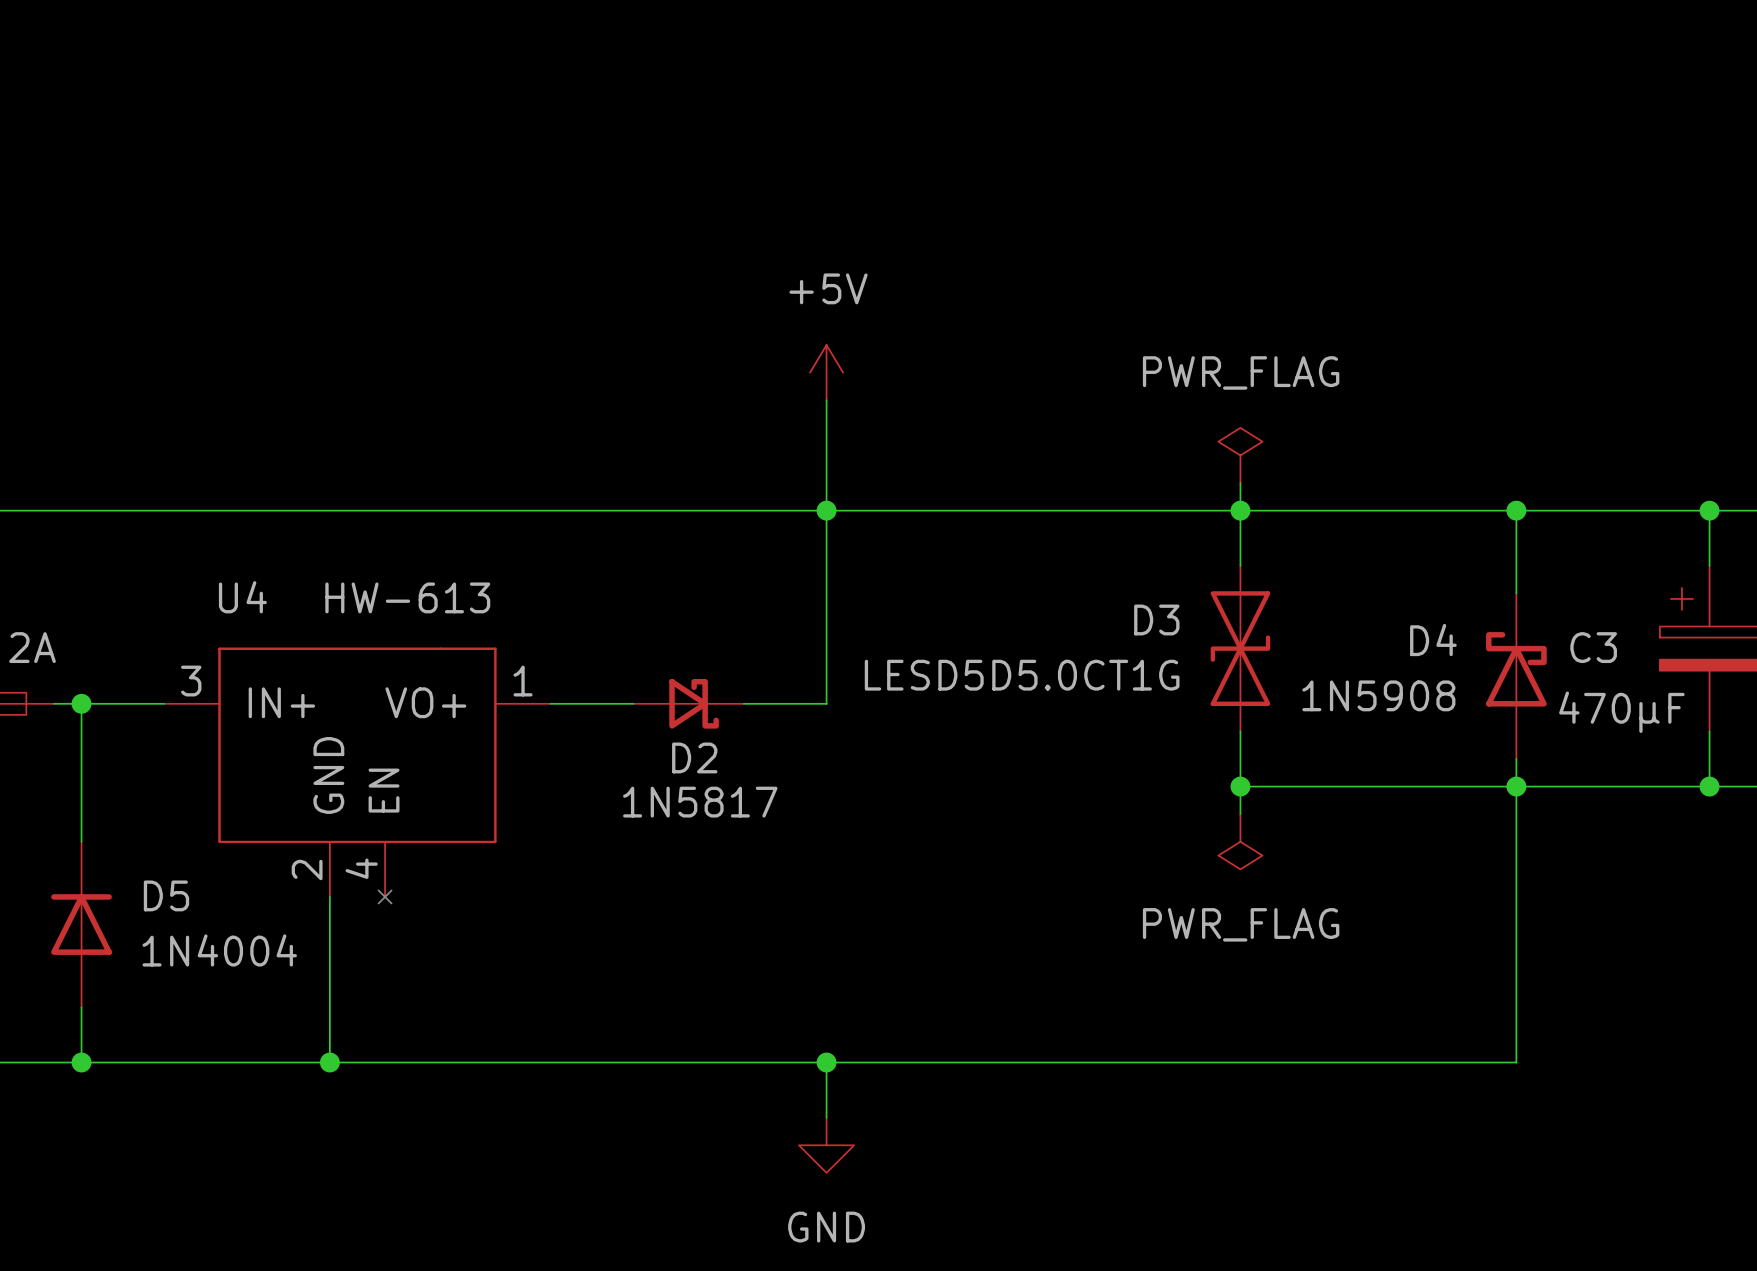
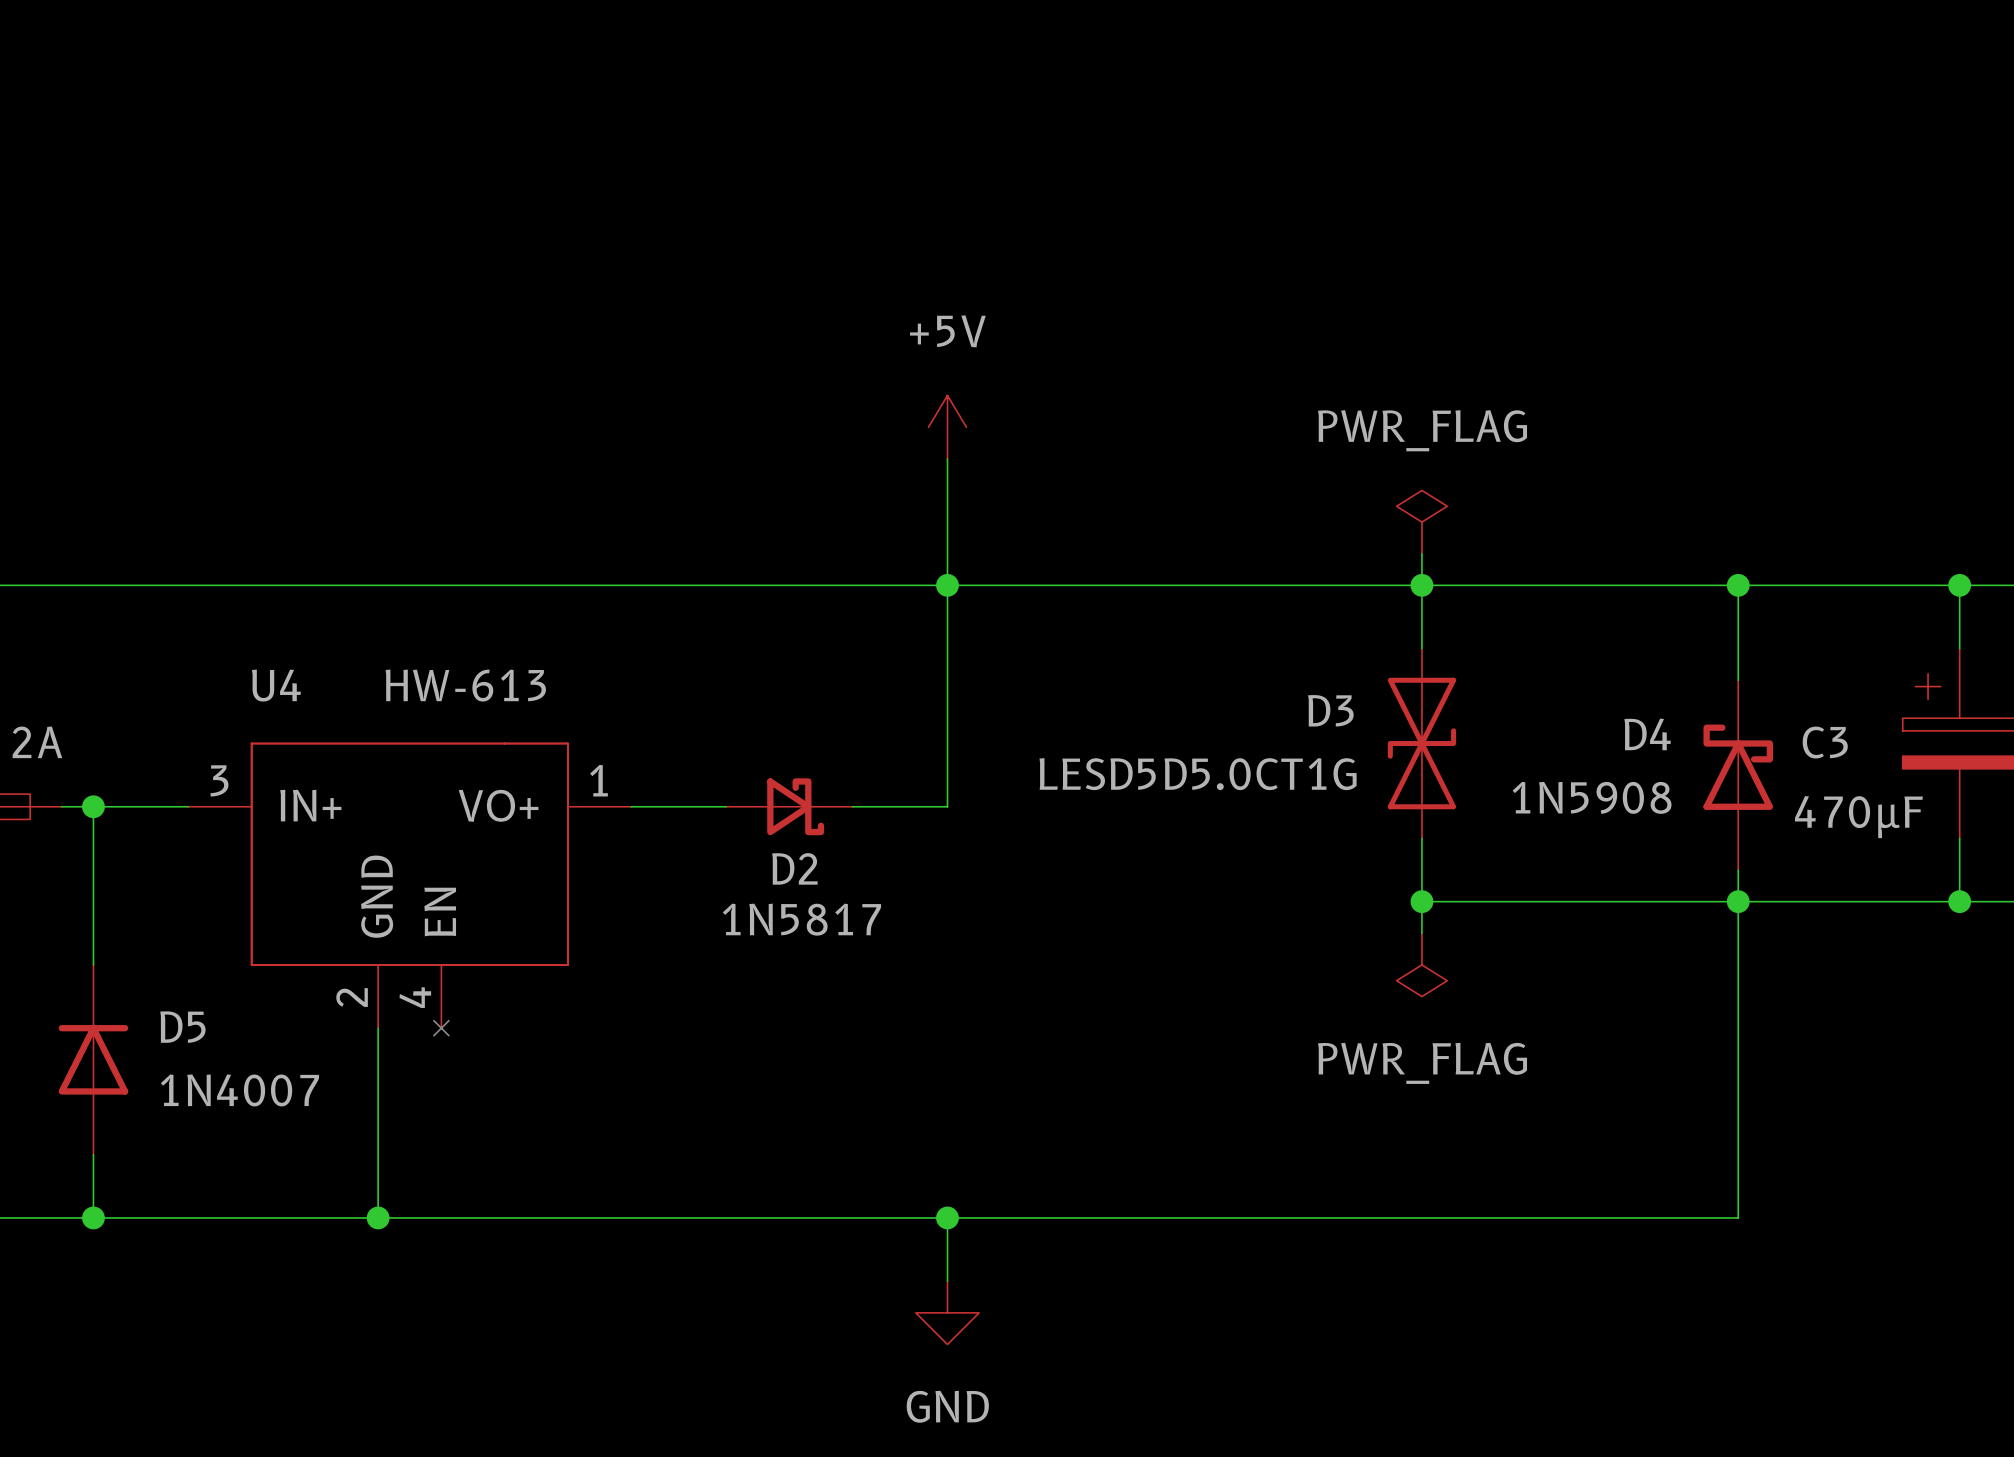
D5 value: 1N4004 (219, 950) -> 1N4007 (239, 1090)

